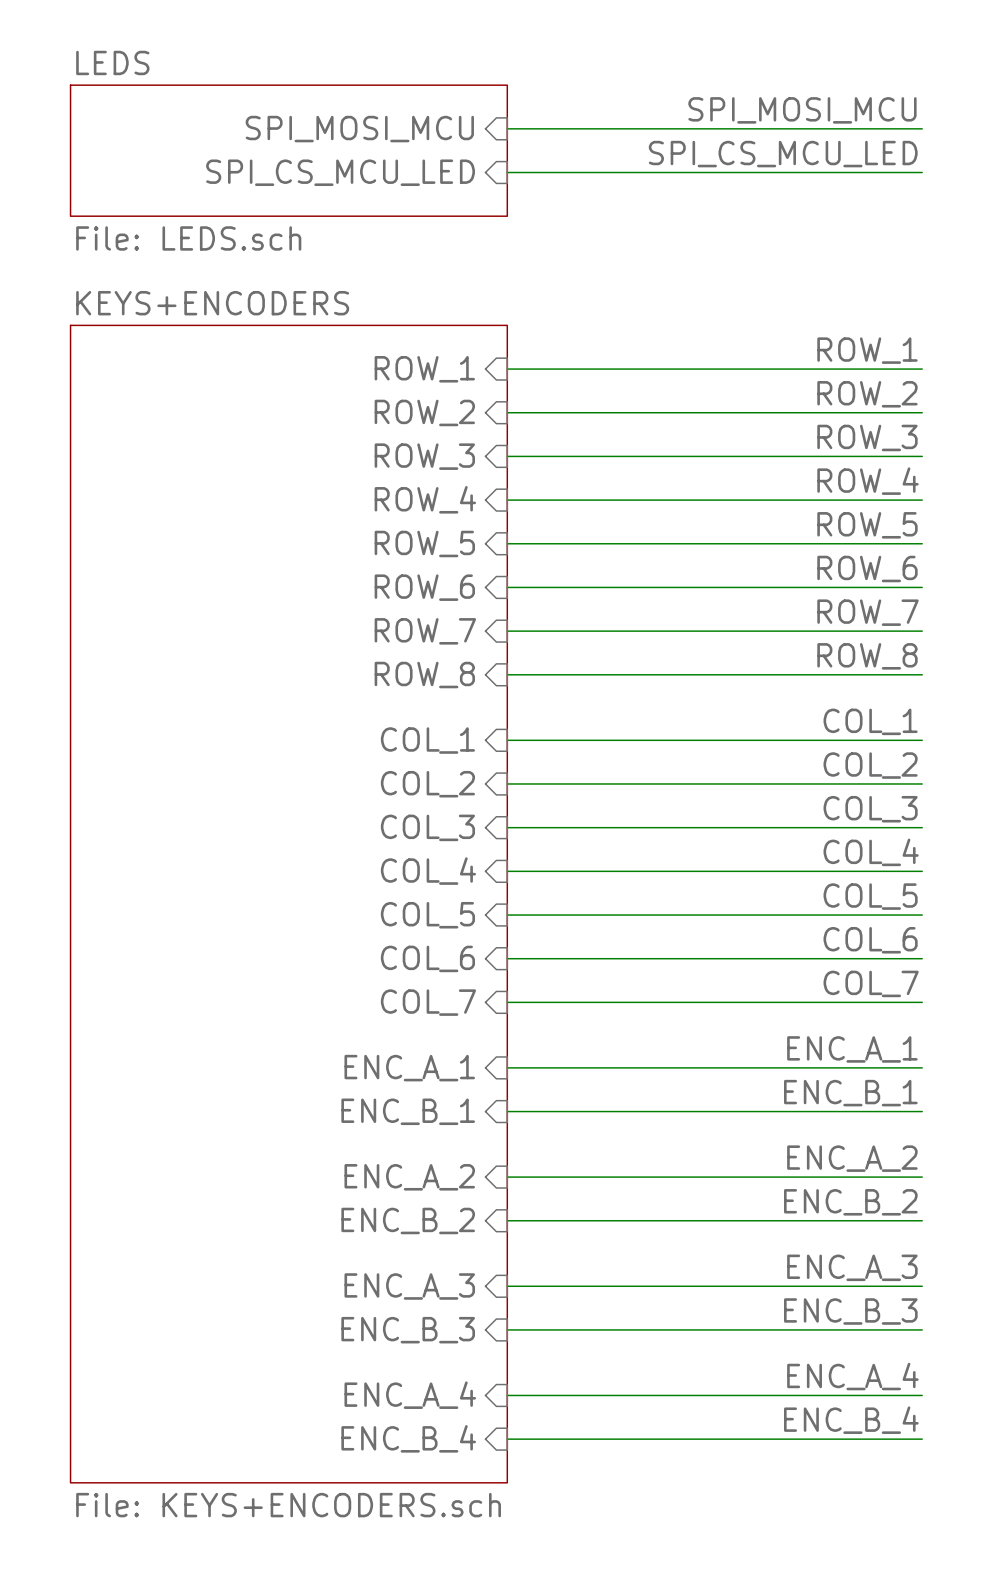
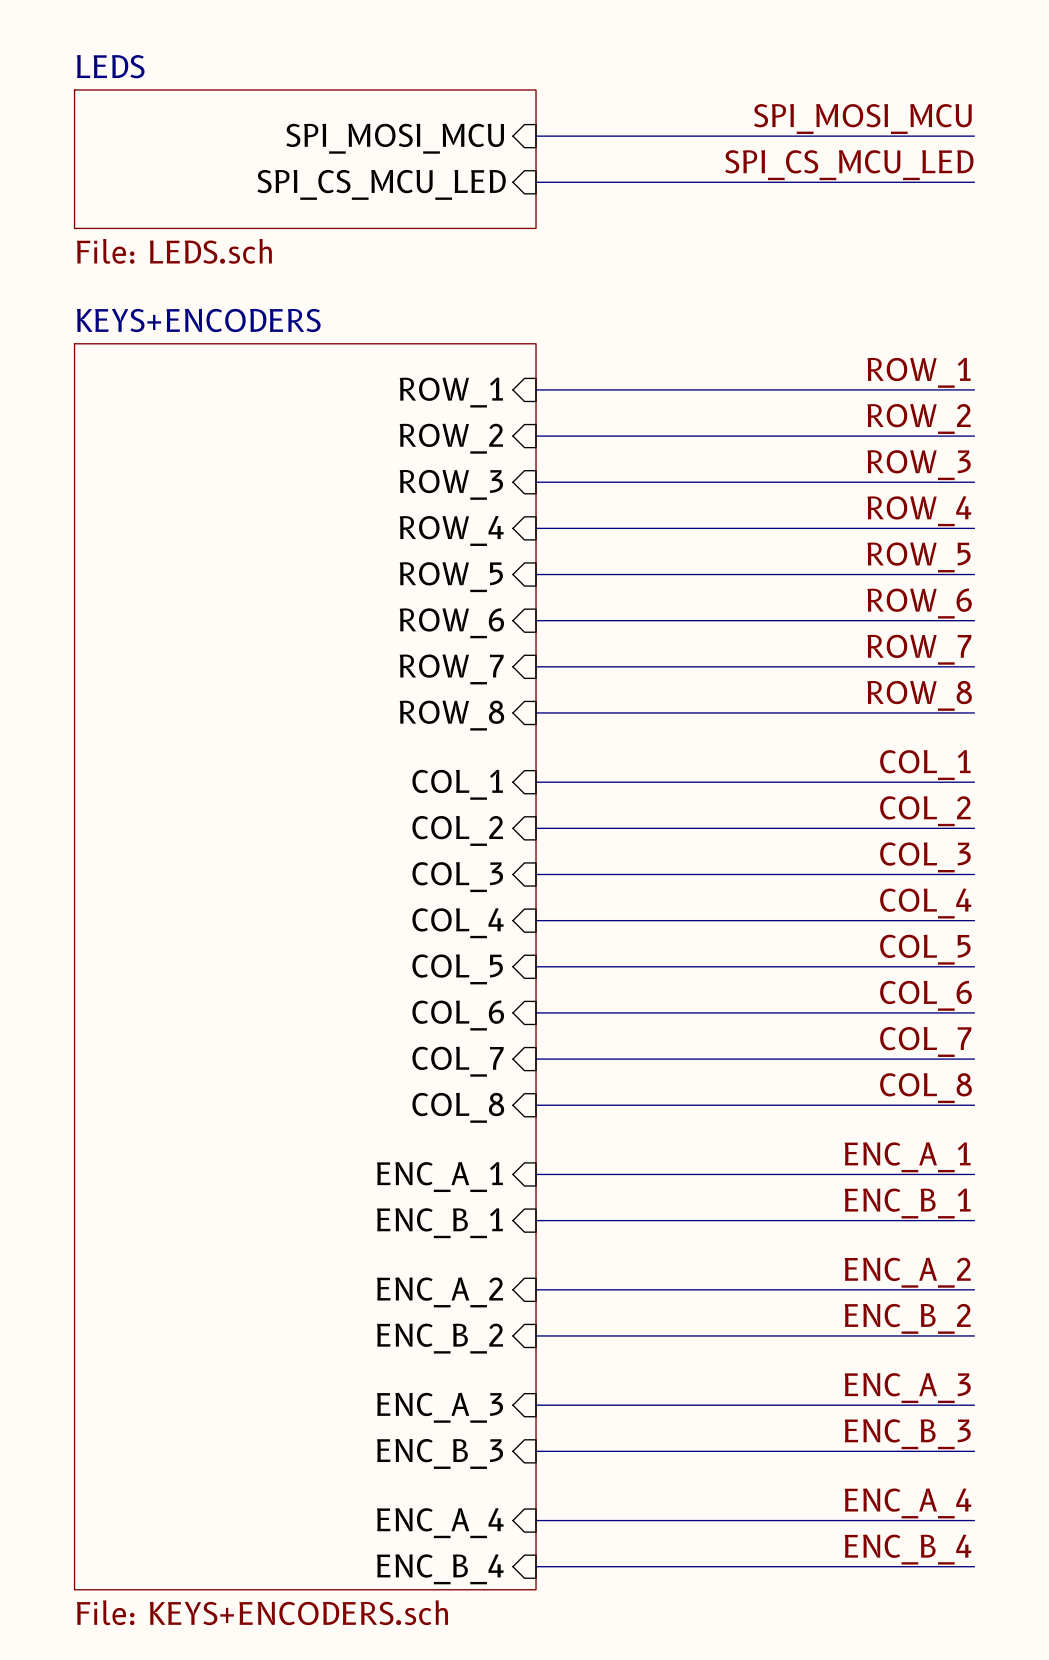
sheet KEYS+ENCODERS shape: [70, 325, 508, 1483] -> [74, 343, 537, 1590]
label: none -> COL_8 (925, 1088)
sheet pin: none -> COL_8 (458, 1107)
label: ENC_A_1 (852, 1049) -> none
wire: (507, 1067) (922, 1067) -> (536, 1105) (974, 1105)
sheet pin: ENC_A_1 (409, 1068) -> none
label: ENC_B_1 (850, 1093) -> ENC_A_1 (907, 1157)
sheet pin: ENC_B_1 (408, 1111) -> ENC_A_1 (439, 1177)
label: ENC_A_2 (852, 1158) -> ENC_B_1 (907, 1203)
sheet pin: ENC_A_2 (409, 1177) -> ENC_B_1 (439, 1223)
wire: (507, 1177) (922, 1177) -> (536, 1220) (974, 1220)
label: ENC_B_2 (850, 1202) -> ENC_A_2 (907, 1272)
sheet pin: ENC_B_2 (408, 1220) -> ENC_A_2 (440, 1292)
label: ENC_A_3 (852, 1267) -> ENC_B_2 (907, 1318)
sheet pin: ENC_A_3 (409, 1286) -> ENC_B_2 (440, 1338)
wire: (507, 1286) (922, 1286) -> (536, 1335) (974, 1335)
label: ENC_B_3 (850, 1311) -> ENC_A_3 (907, 1388)
sheet pin: ENC_B_3 (408, 1330) -> ENC_A_3 (440, 1407)
label: ENC_A_4 (852, 1376) -> ENC_B_3 (907, 1434)
sheet pin: ENC_A_4 (410, 1395) -> ENC_B_3 (440, 1453)
wire: (507, 1395) (922, 1395) -> (536, 1451) (974, 1451)
label: ENC_B_4 (851, 1420) -> ENC_A_4 (908, 1503)
sheet pin: ENC_B_4 (408, 1438) -> ENC_A_4 (440, 1523)
label: none -> ENC_B_4 (908, 1549)
sheet pin: none -> ENC_B_4 (440, 1569)
wire: none -> (536, 1566) (974, 1566)

